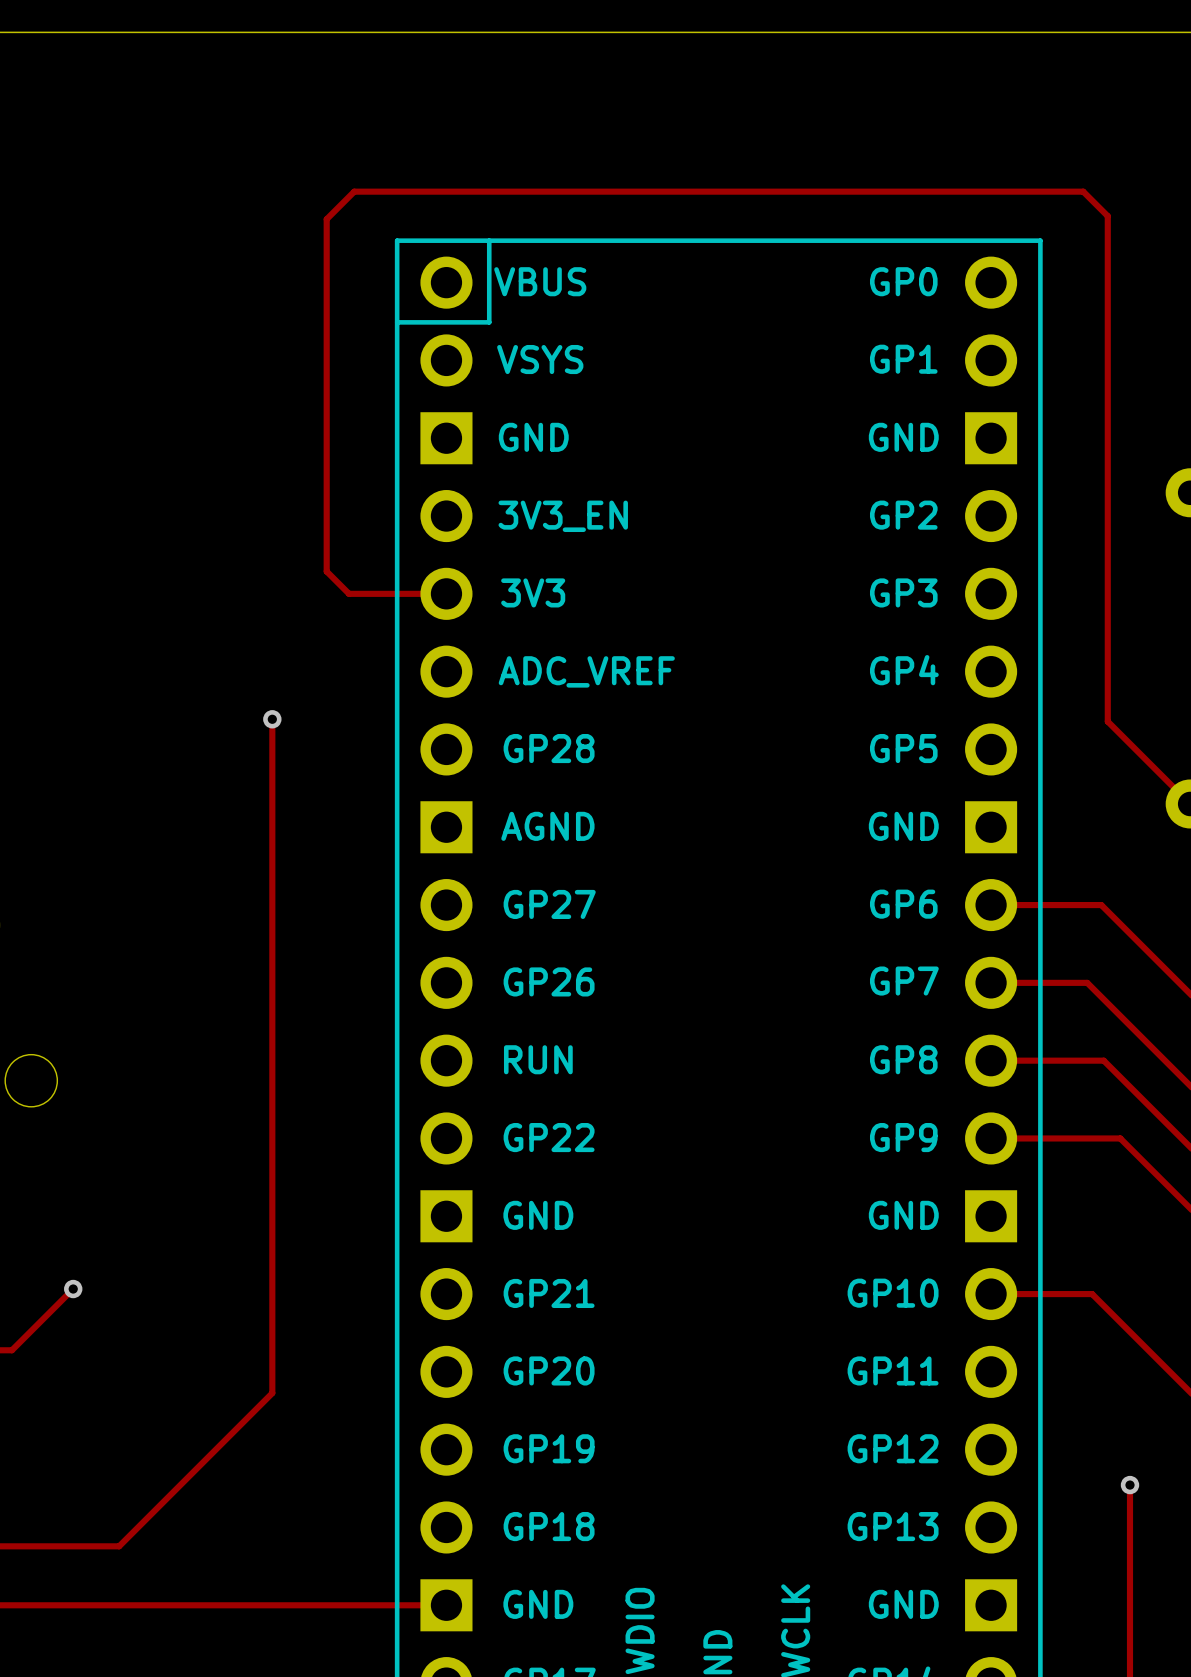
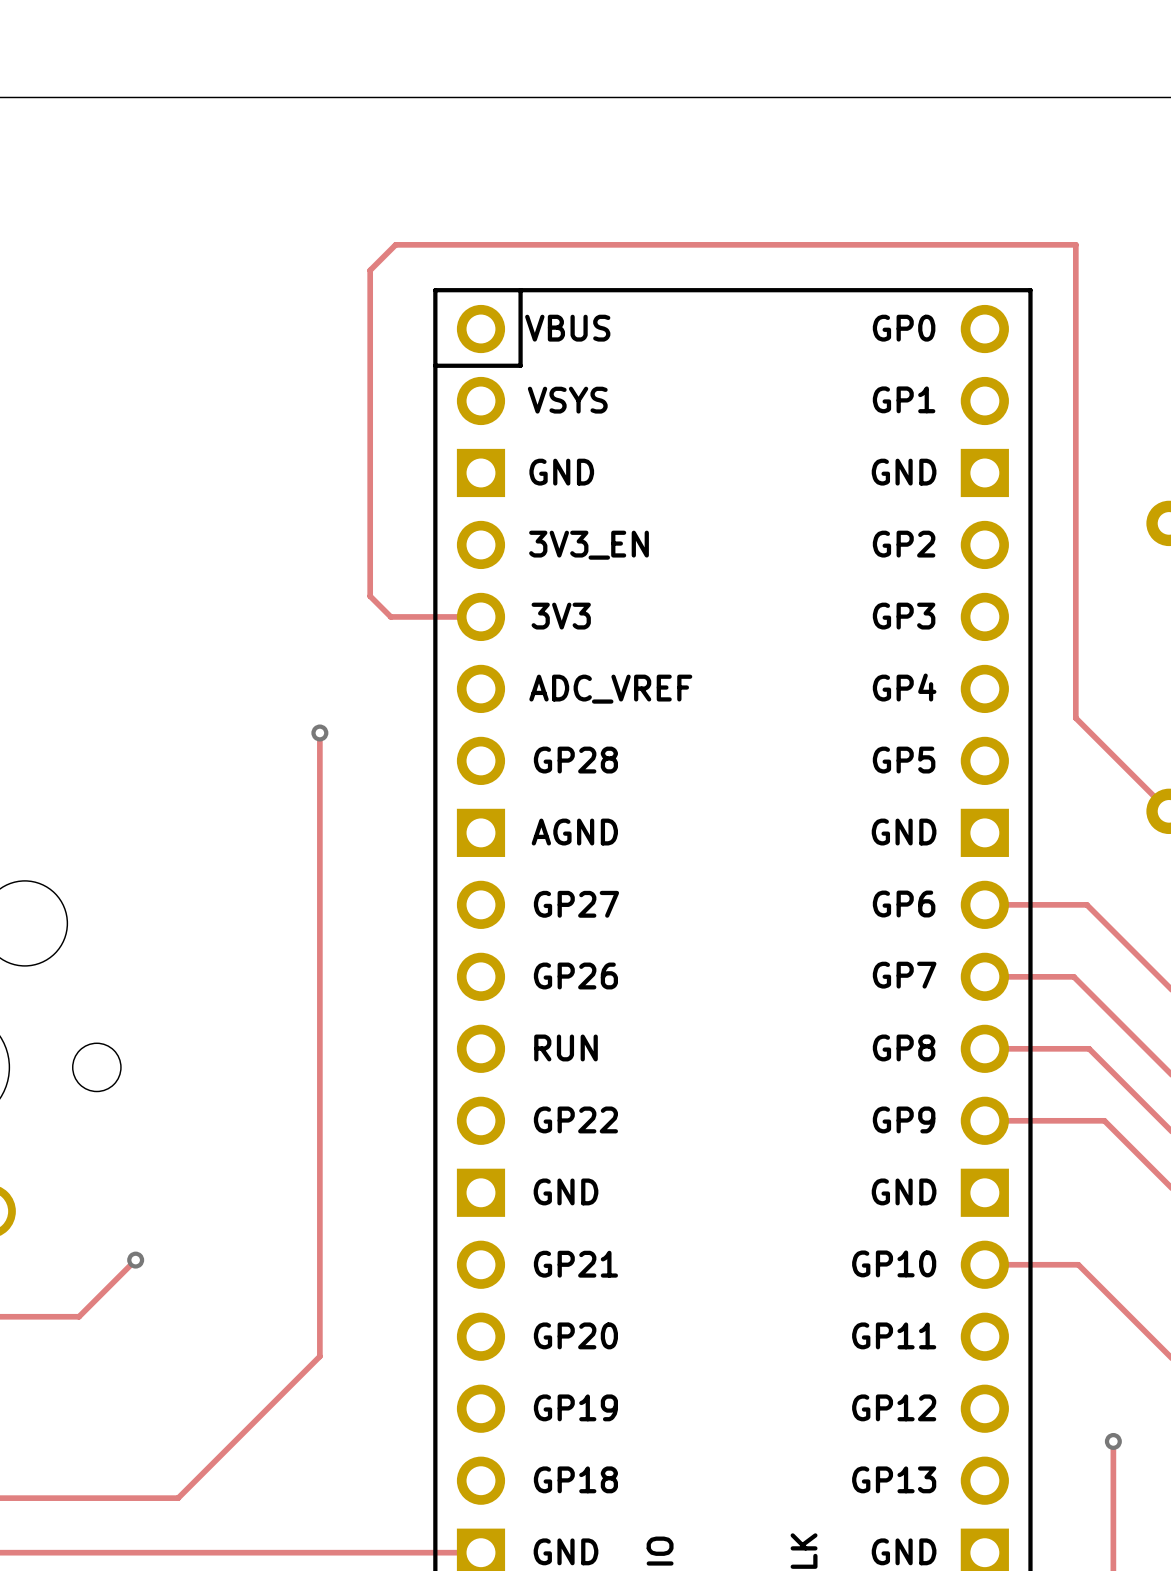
track: (1083, 191) (1107, 216) (1107, 721) -> (1070, 244) (1075, 244) (1075, 718) (1092, 735)

